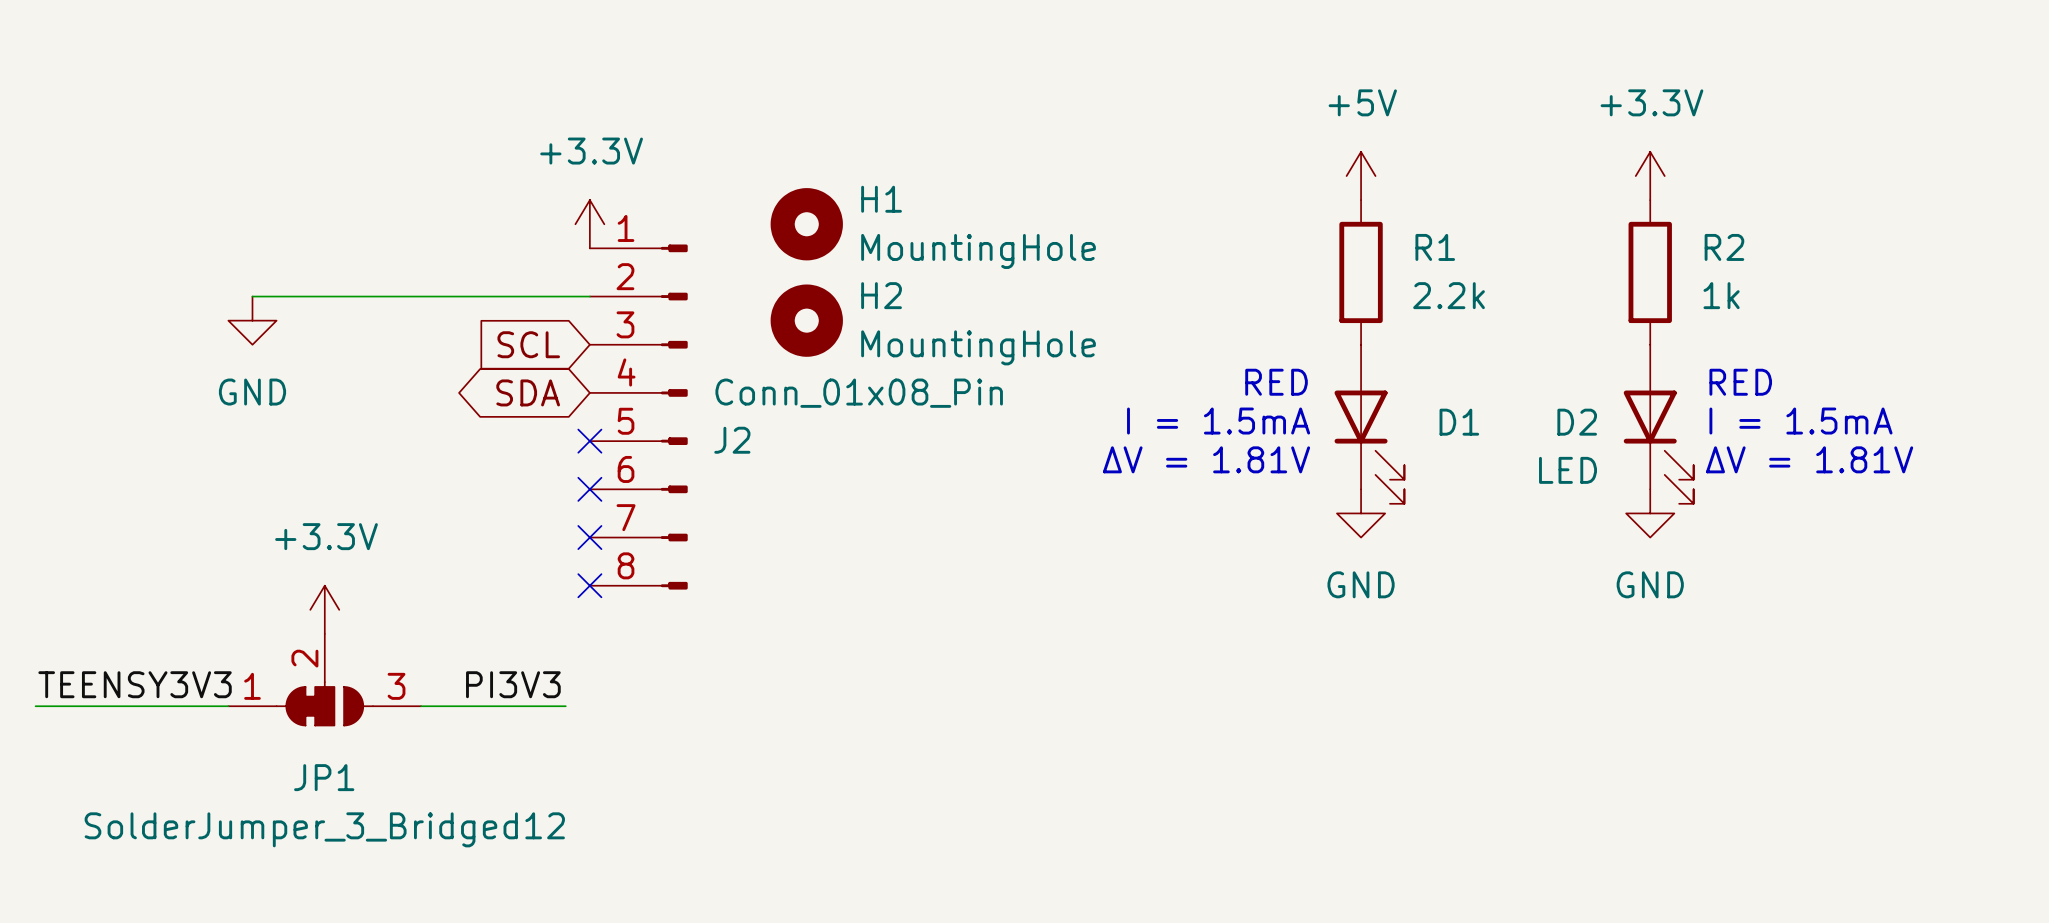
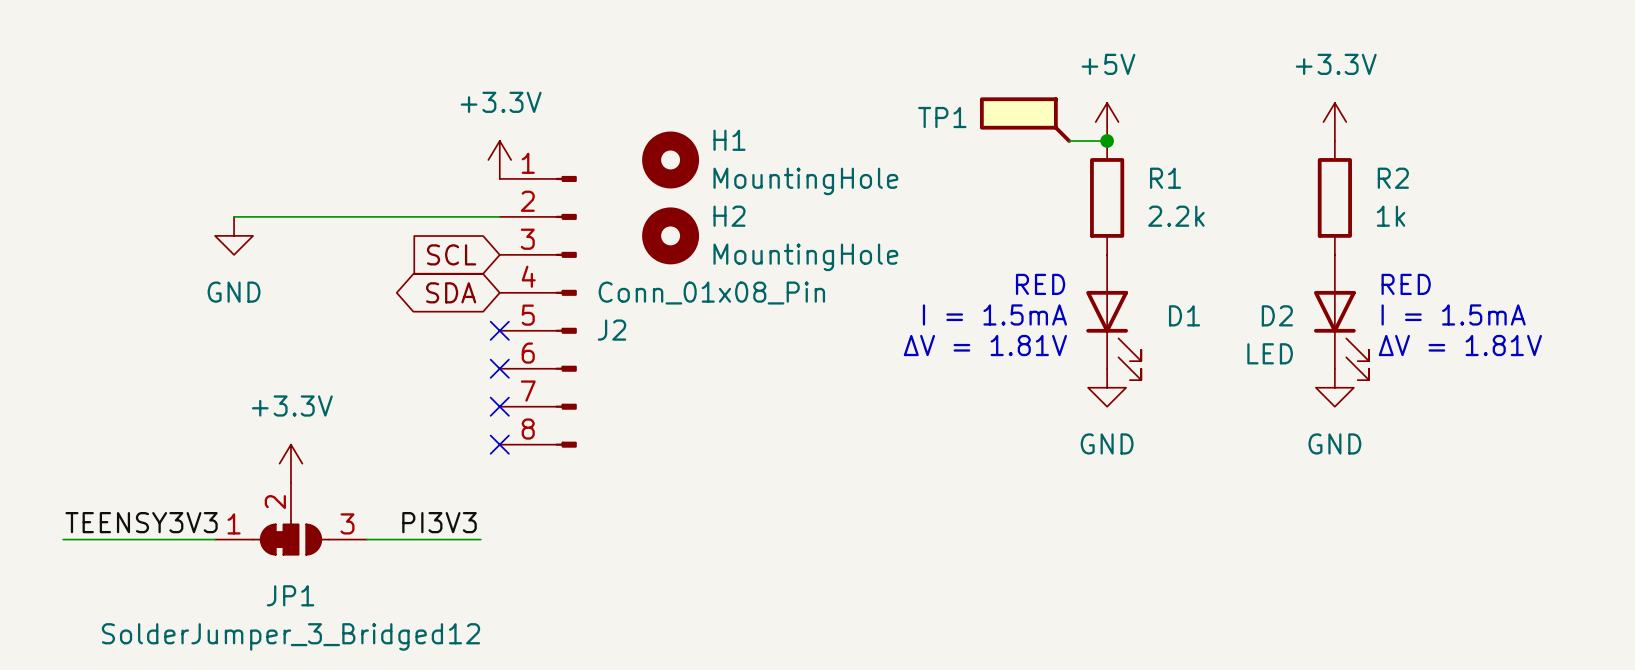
TP1: none -> (1025, 120)
wire: none -> (1069, 140) (1107, 140)
junction: none -> (1107, 140)

